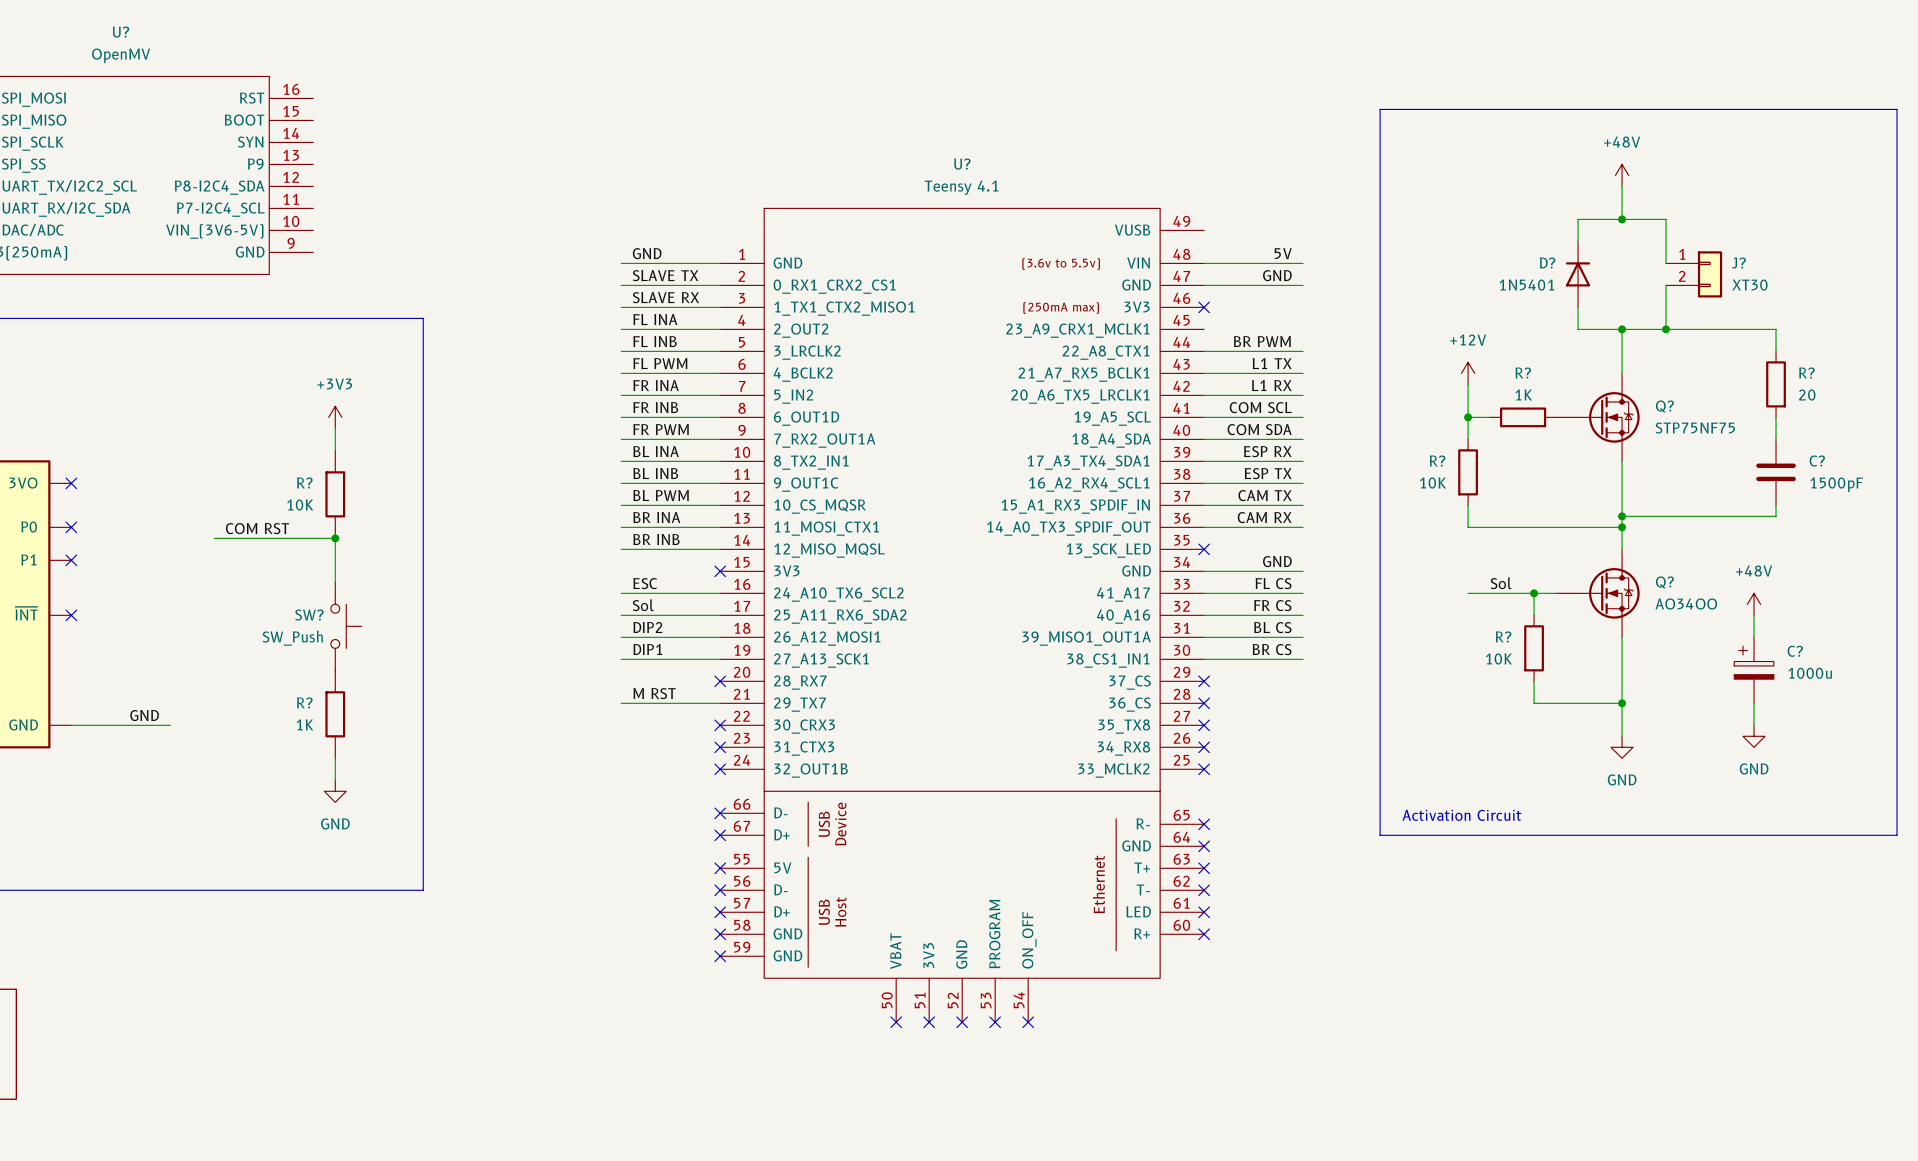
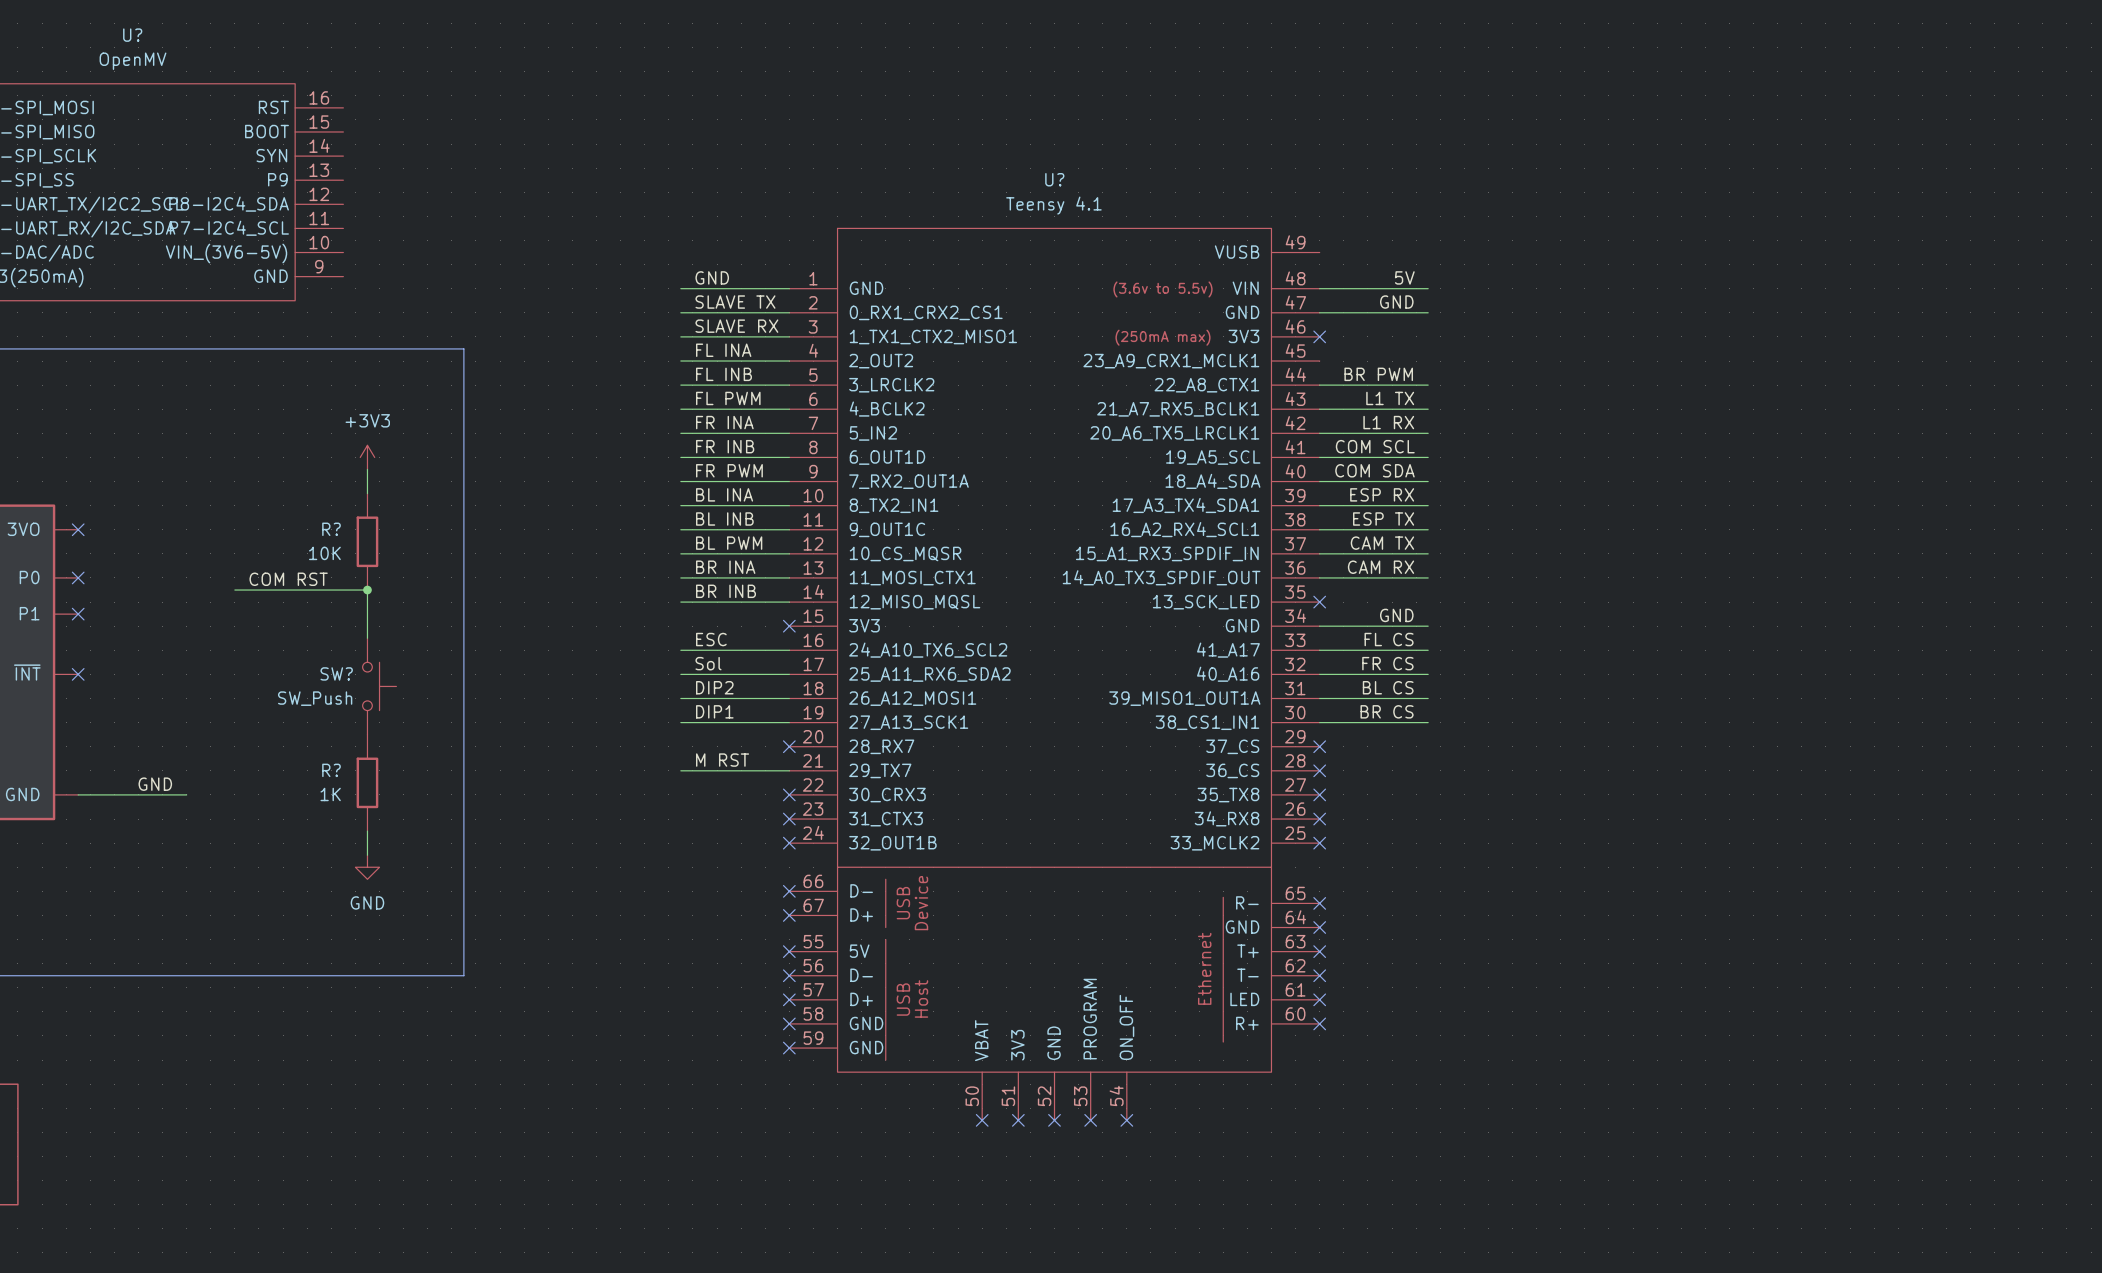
line: (1380, 109) (1896, 109) (1896, 835) (1380, 835) (1380, 109) -> none
power symbol: +48V (1622, 175) -> none
wire: (1622, 186) (1622, 219) -> none
junction: (1622, 219) -> none
wire: (1578, 241) (1578, 219) (1666, 219) (1666, 263) -> none
D?: 1N5401 (1578, 274) -> none
J?: XT30 (1694, 274) -> none
wire: (1666, 285) (1666, 329) -> none
wire: (1578, 307) (1578, 329) (1776, 329) (1776, 351) -> none
wire: (1622, 329) (1622, 373) -> none
junction: (1622, 329) -> none
junction: (1666, 329) -> none
power symbol: +12V (1468, 373) -> none
wire: (1468, 384) (1468, 439) -> none
R?: 20 (1776, 384) -> none
wire: (1468, 417) (1490, 417) -> none
junction: (1468, 417) -> none
R?: 1K (1523, 417) -> none
Q?: STP75NF75 (1597, 417) -> none
wire: (1776, 417) (1776, 439) -> none
wire: (1622, 461) (1622, 549) -> none
R?: 10K (1468, 472) -> none
C?: 1500pF (1776, 472) -> none
wire: (1468, 505) (1468, 527) (1622, 527) -> none
wire: (1776, 505) (1776, 516) (1622, 516) -> none
junction: (1622, 516) -> none
junction: (1622, 527) -> none
label: Sol (1501, 583) -> none
wire: (1468, 593) (1556, 593) -> none
wire: (1534, 593) (1534, 615) -> none
junction: (1534, 593) -> none
Q?: AO34OO (1597, 593) -> none
power symbol: +48V (1754, 604) -> none
wire: (1754, 615) (1754, 637) -> none
wire: (1622, 637) (1622, 736) -> none
R?: 10K (1534, 648) -> none
C?: 1000u (1754, 670) -> none
wire: (1534, 681) (1534, 703) (1622, 703) -> none
junction: (1622, 703) -> none
wire: (1754, 703) (1754, 725) -> none
power symbol: GND (1754, 736) -> none
power symbol: GND (1622, 747) -> none
text: Activation Circuit (1461, 815) -> none

